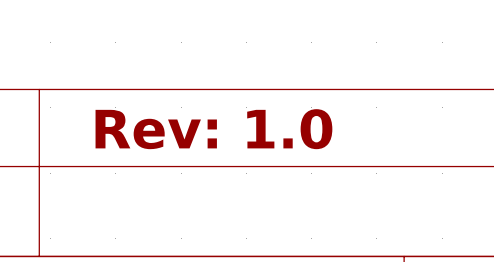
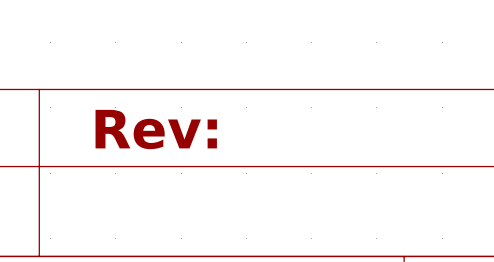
title block: Rev: 1.0 (213, 129) -> Rev: (156, 129)

